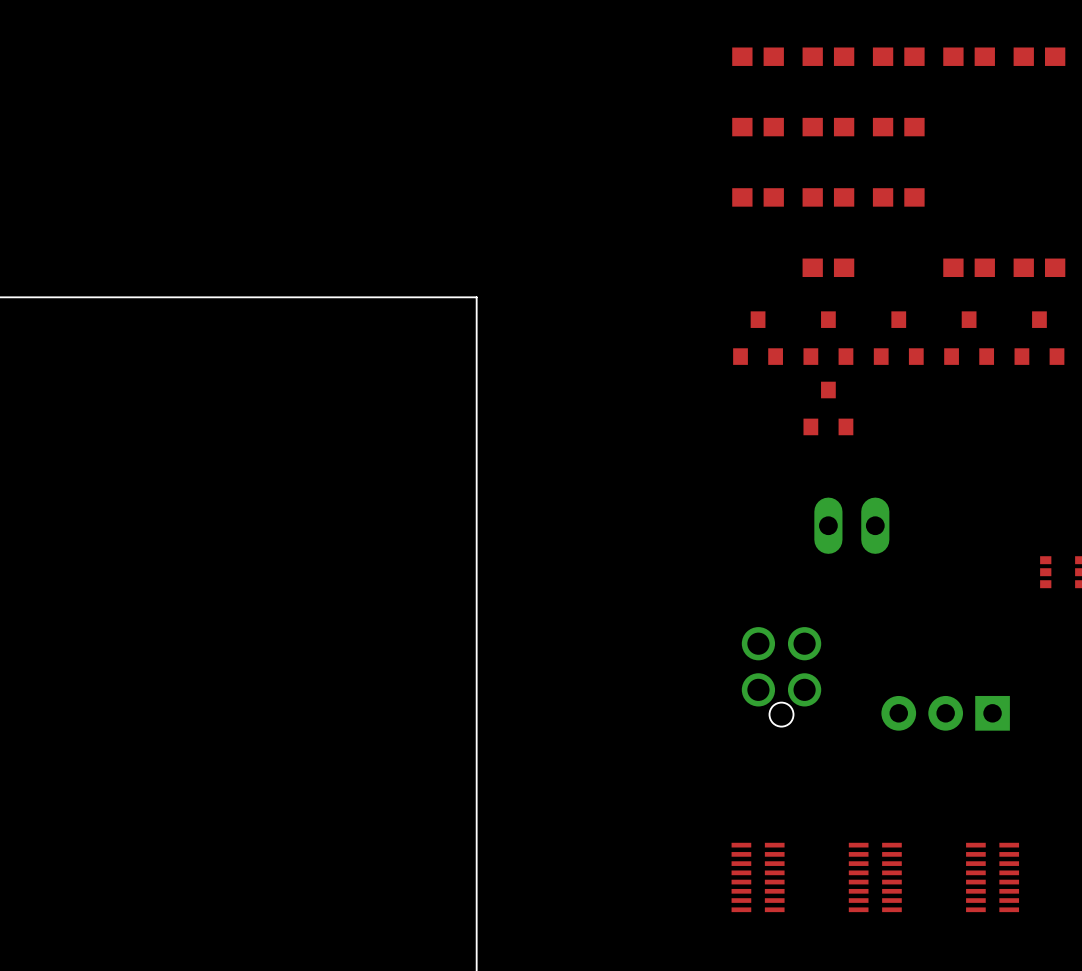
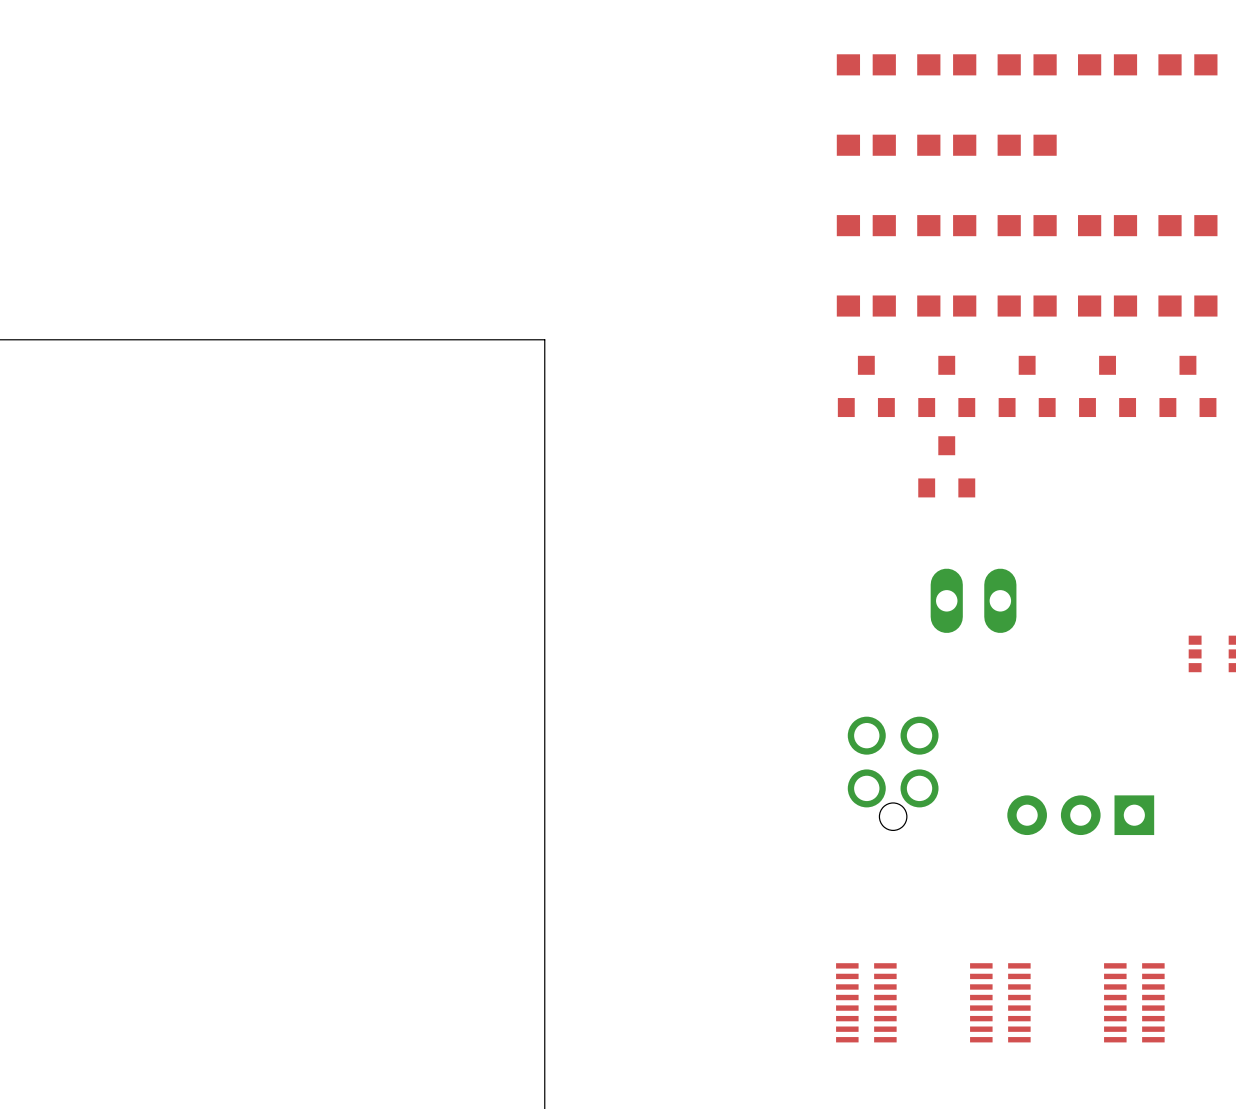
part: none -> (1107, 225)
part: none -> (1187, 225)
part: none -> (866, 306)
part: none -> (1027, 306)

